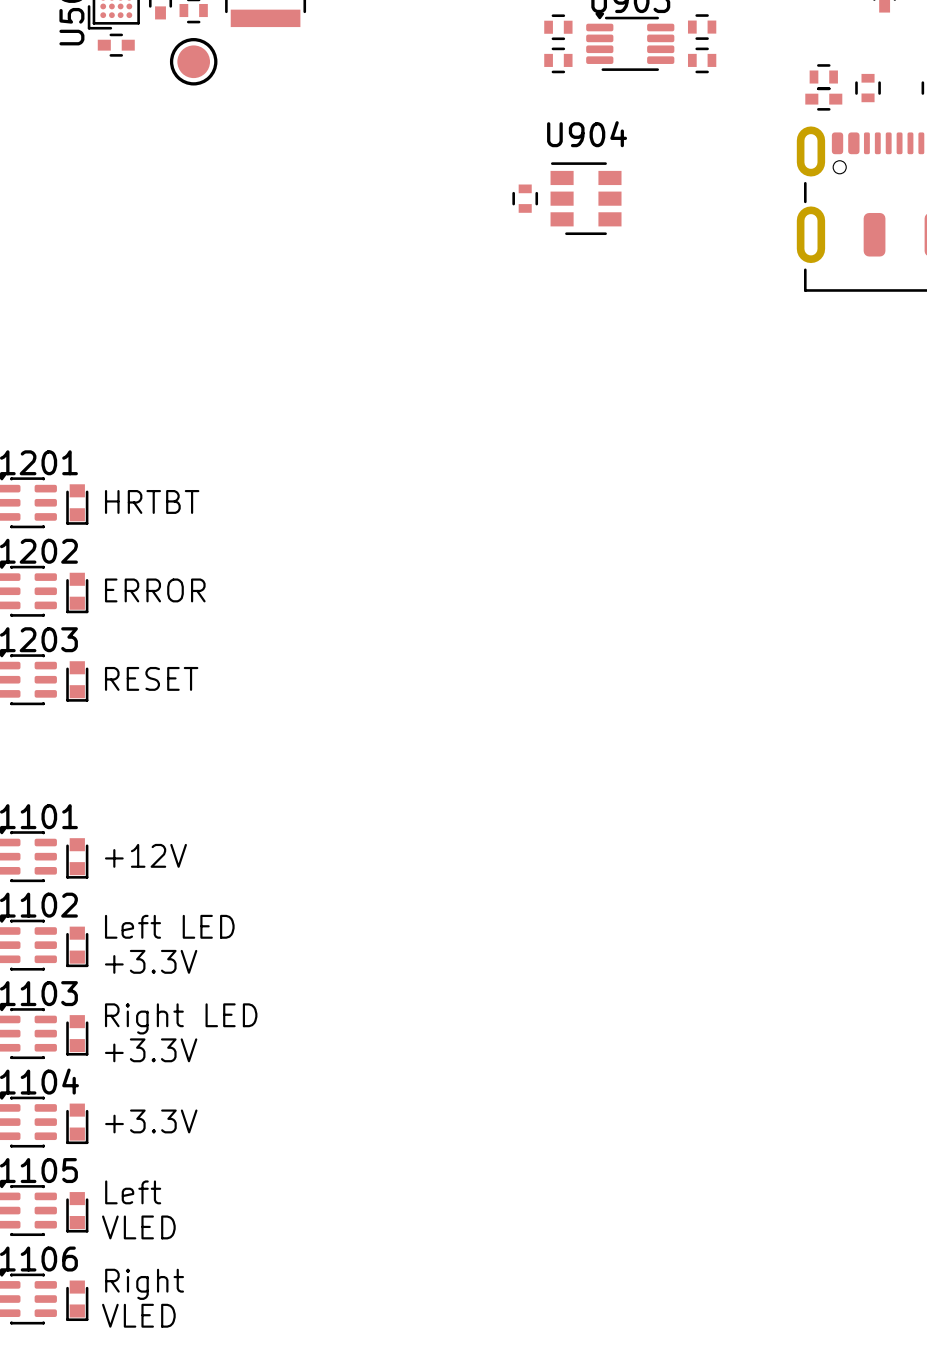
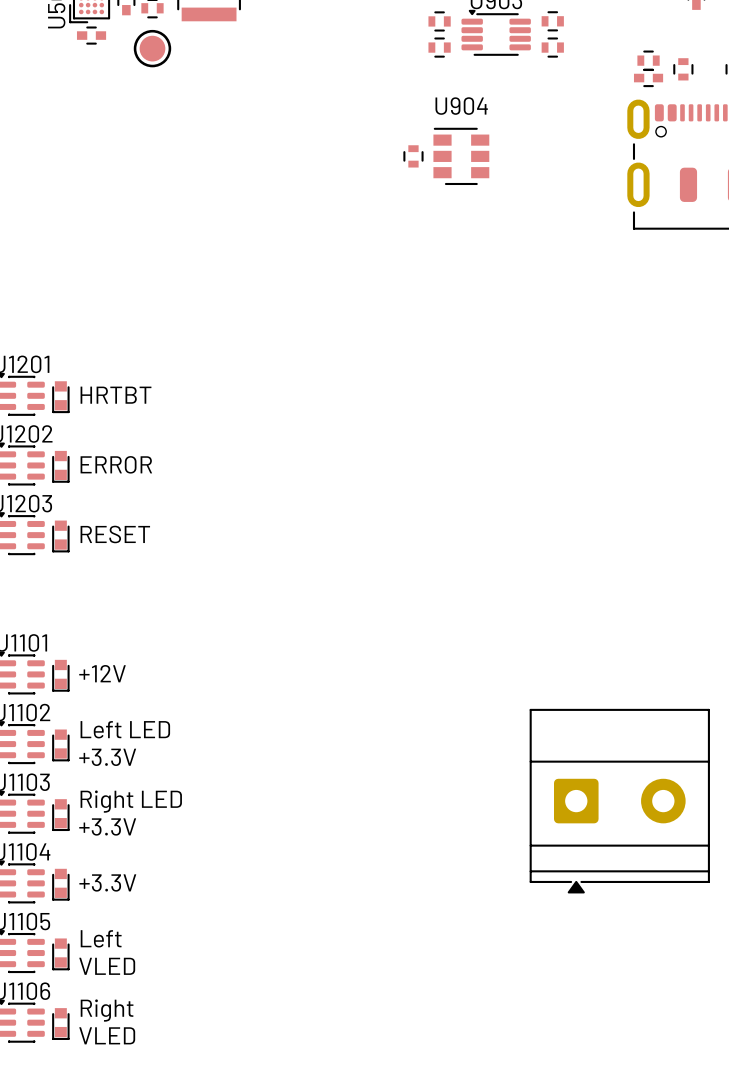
part: none -> (619, 801)

